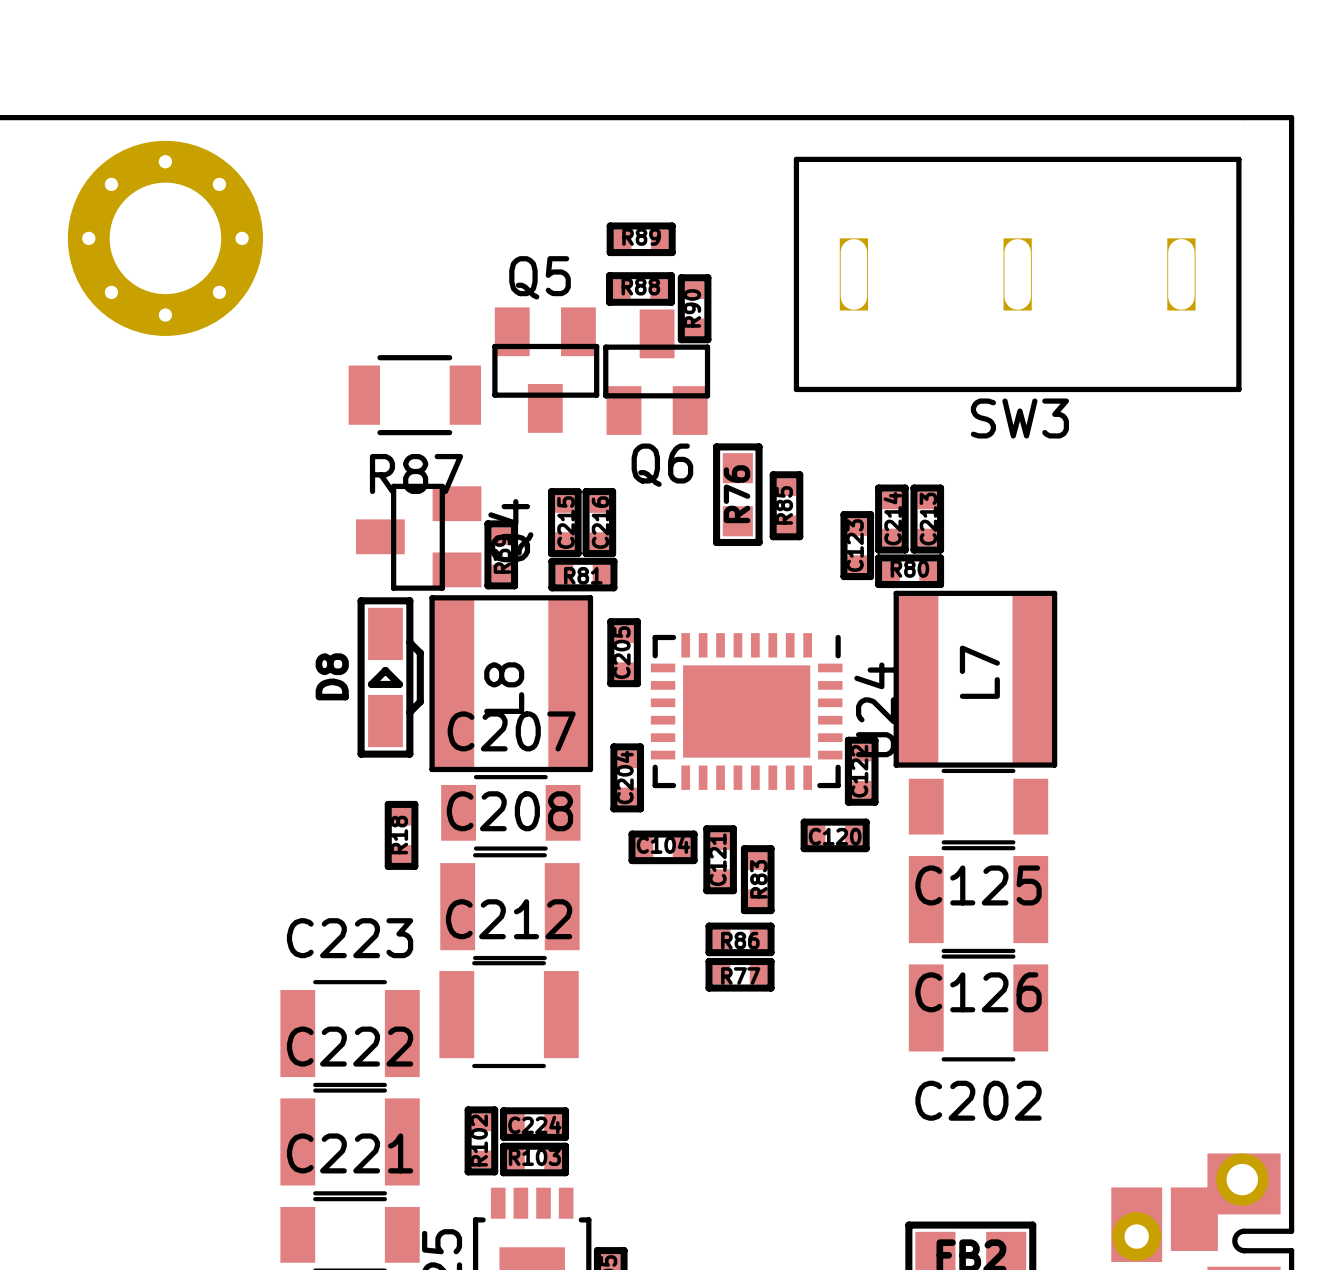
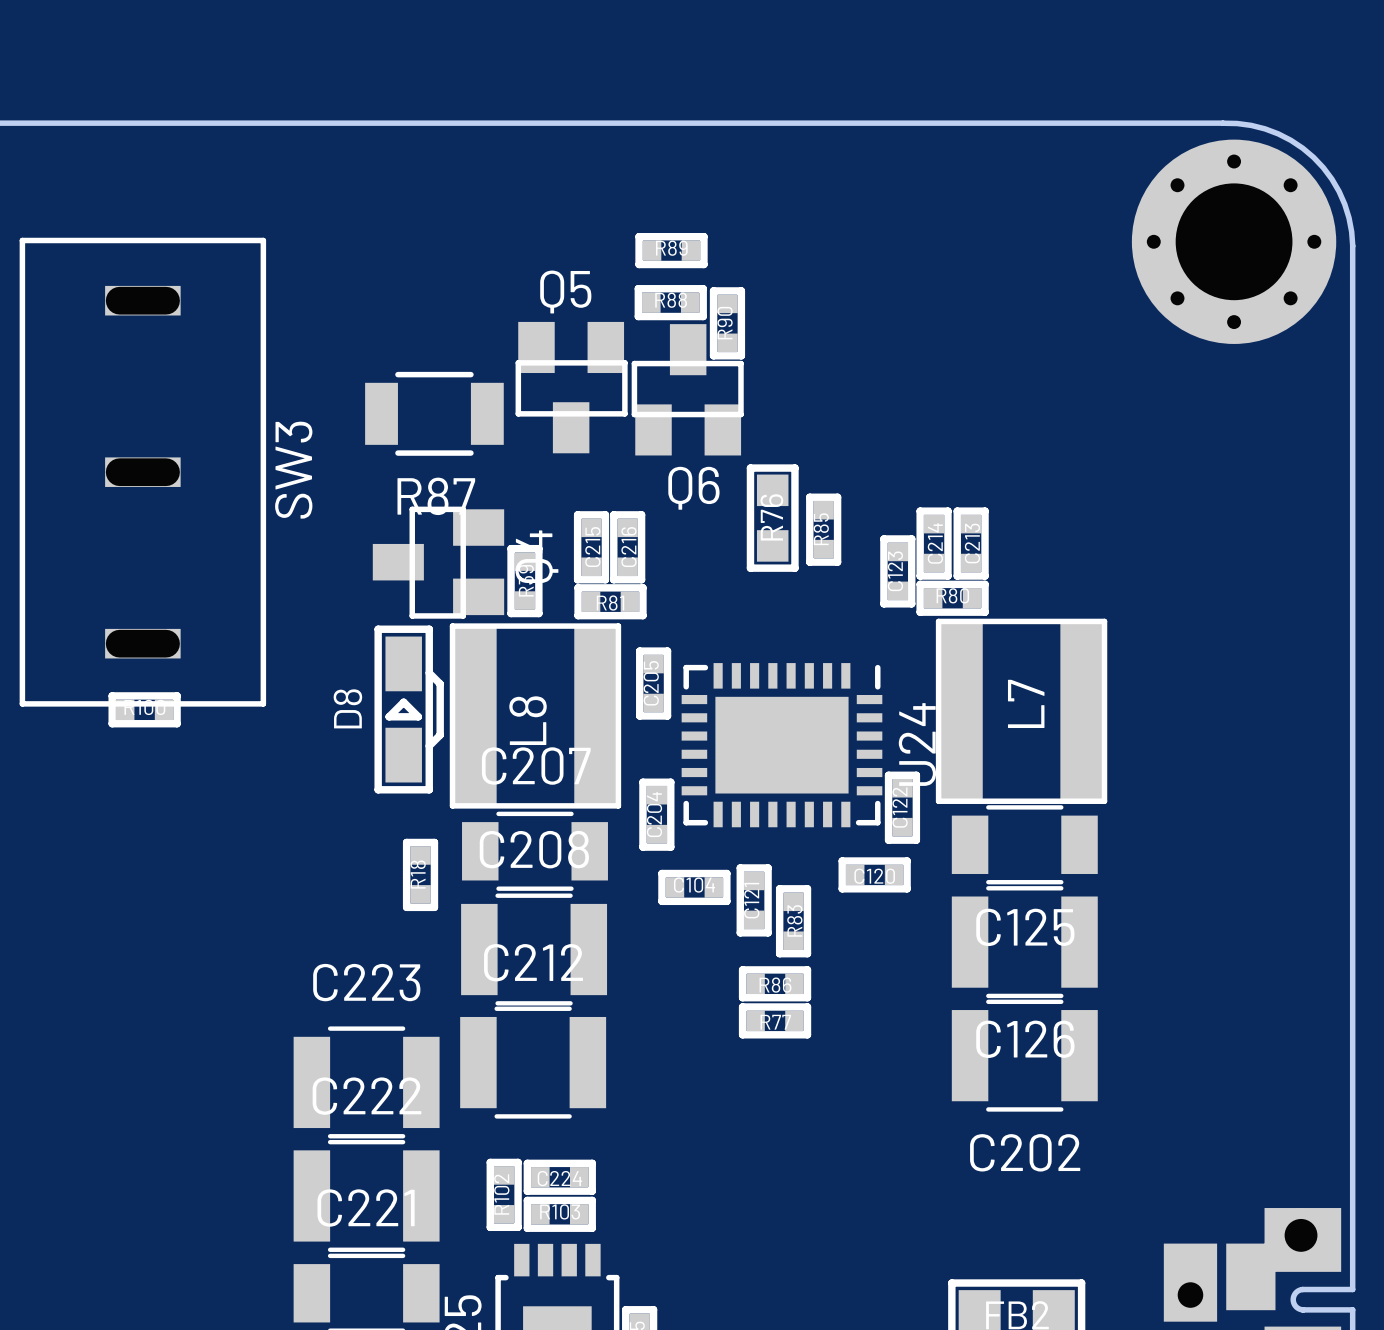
board edge: (1167, 117) (1291, 117) (1291, 234) -> (1222, 123) (1237, 123) (1264, 128) (1290, 140) (1313, 157) (1331, 179) (1339, 191) (1349, 217) (1352, 246)
part: none -> (1234, 241)
part: (165, 238) -> none
SW3 rotation: 0° (1017, 274) -> 90° clockwise (142, 472)
SW3 position: (1017, 274) -> (142, 472)
SW3 name position: SW3 (1019, 418) -> SW3 (293, 470)
part: none -> (144, 709)

